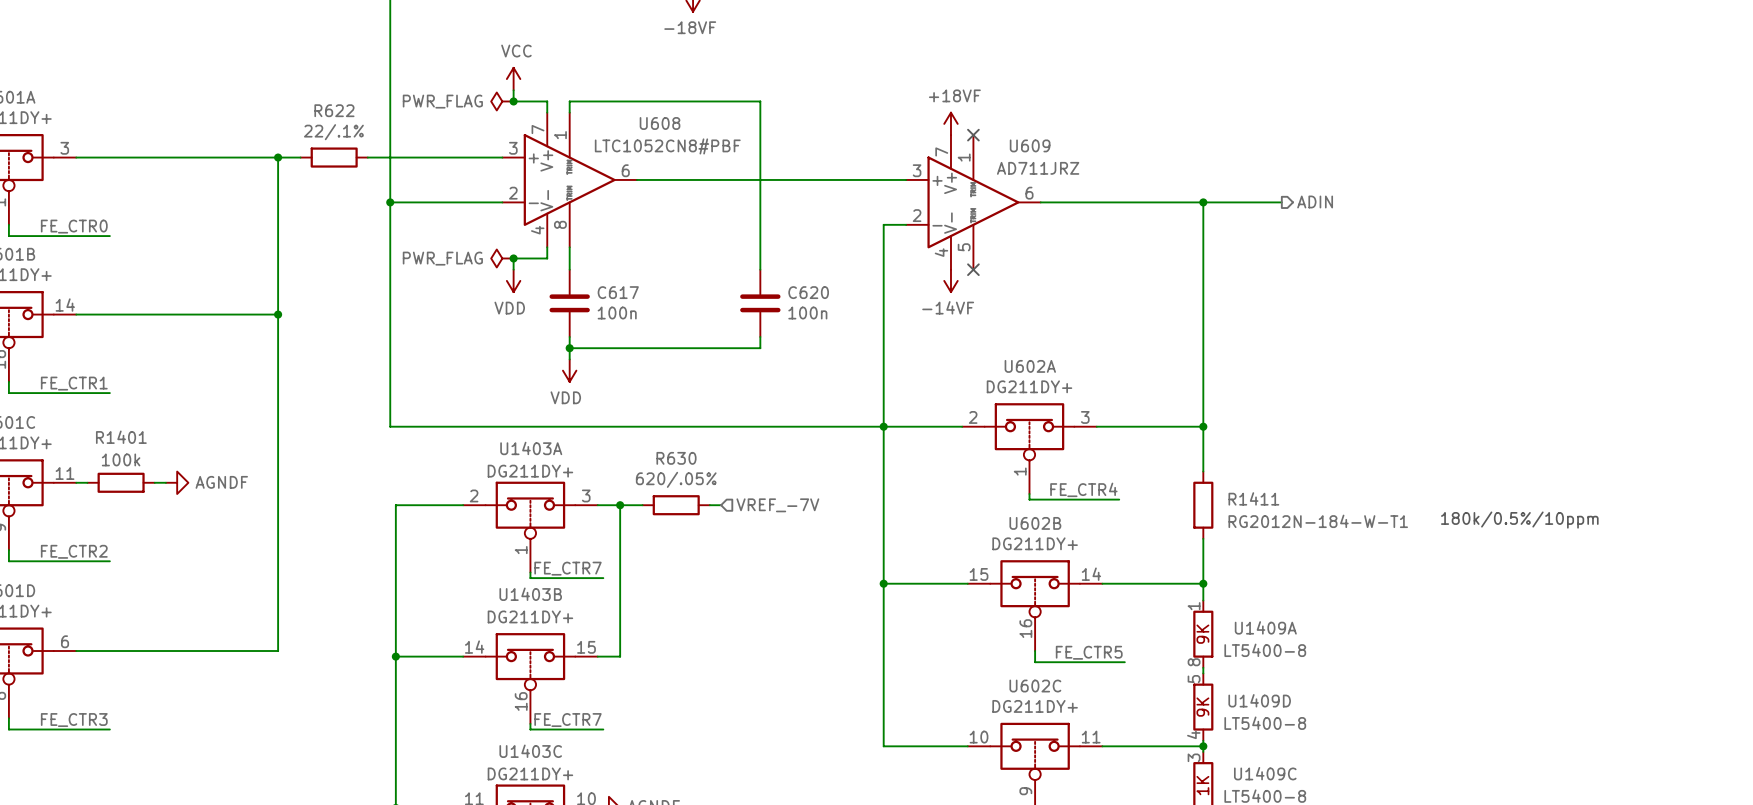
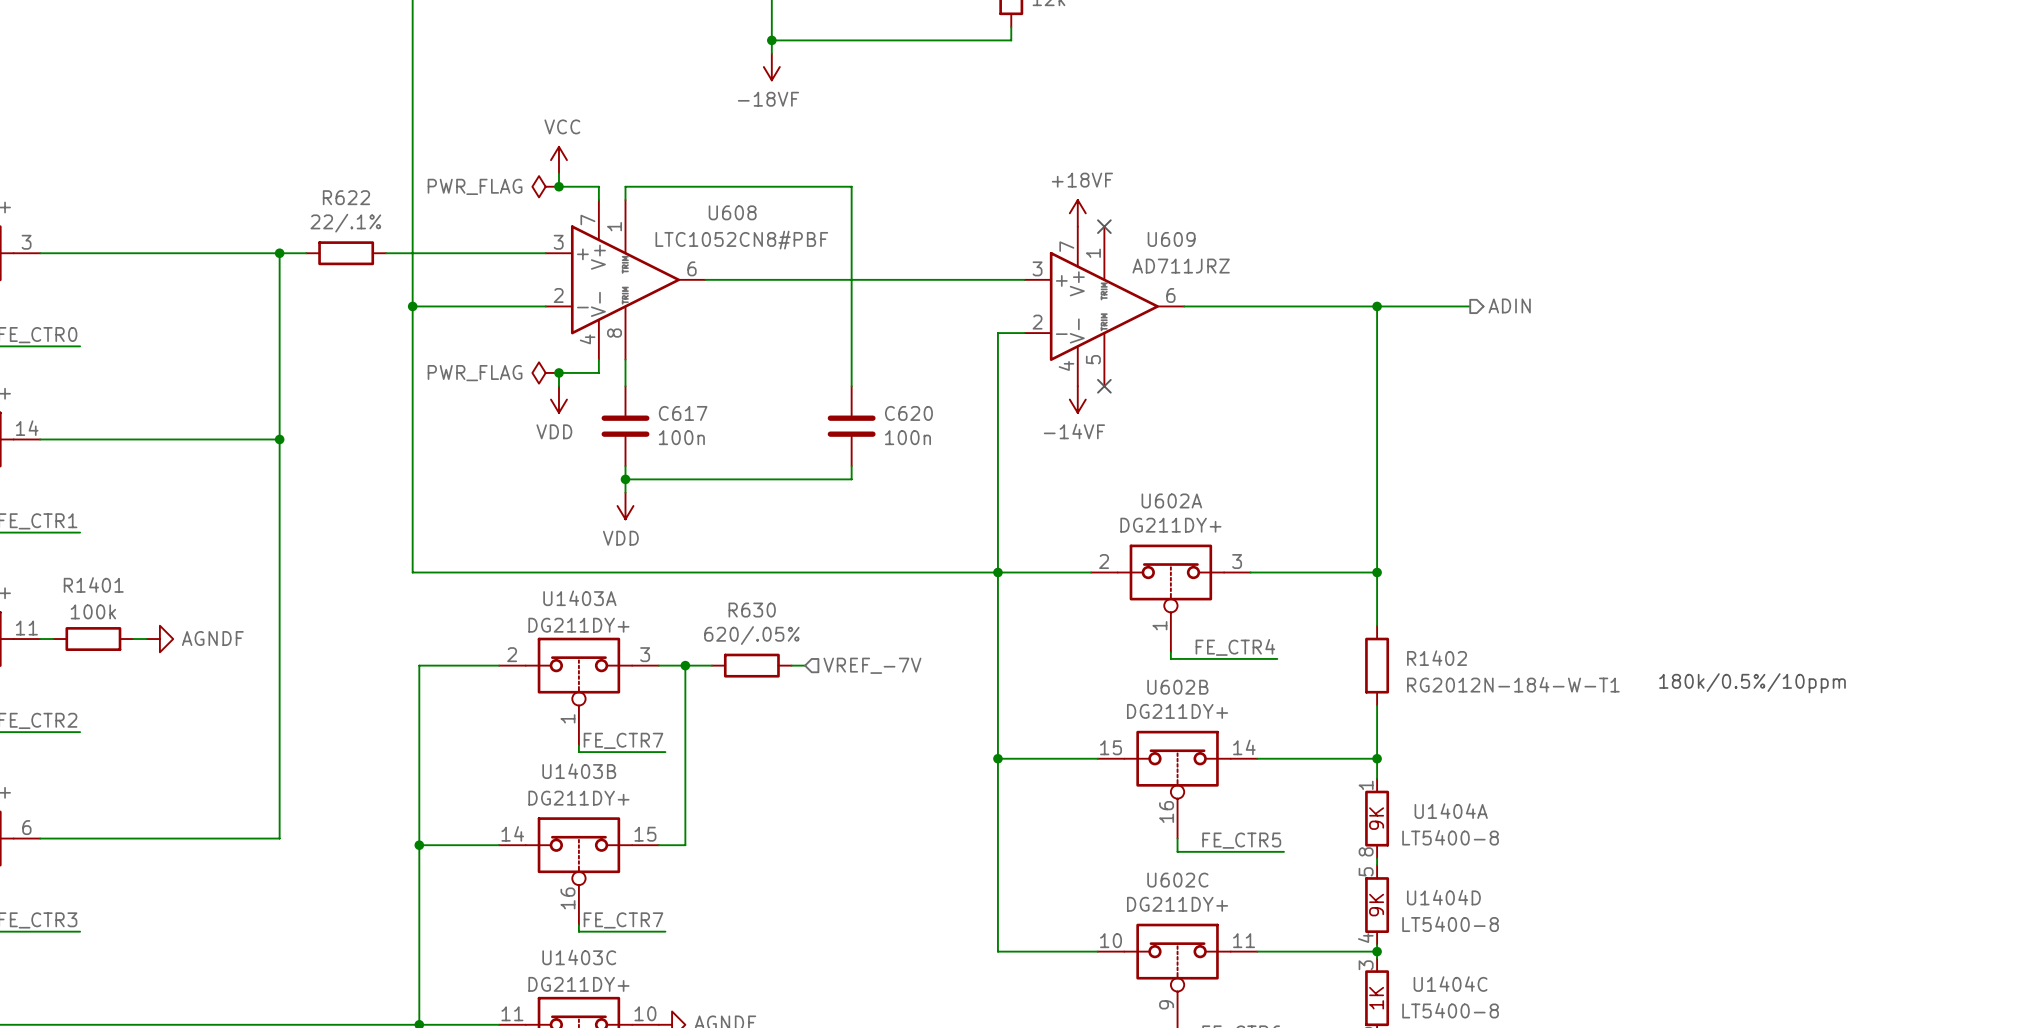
R1411 name: R1411 (1253, 498) -> R1402 (1437, 658)
U1409A name: U1409A (1265, 627) -> U1404A (1451, 811)
U1409D name: U1409D (1259, 700) -> U1404D (1443, 897)
U1409C name: U1409C (1265, 773) -> U1404C (1450, 984)

